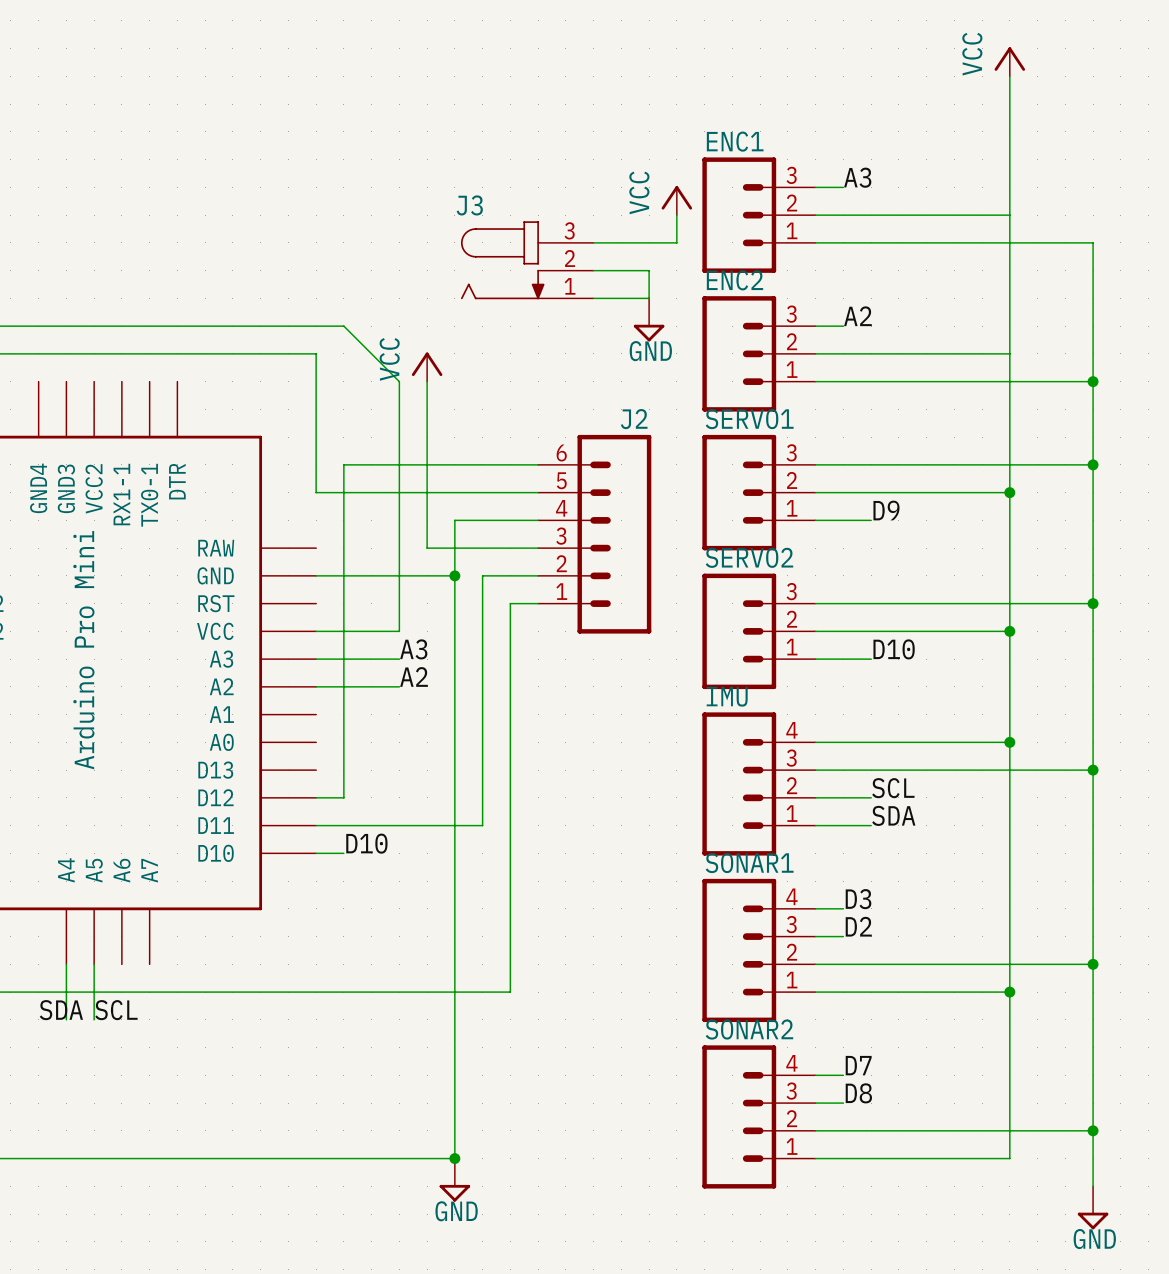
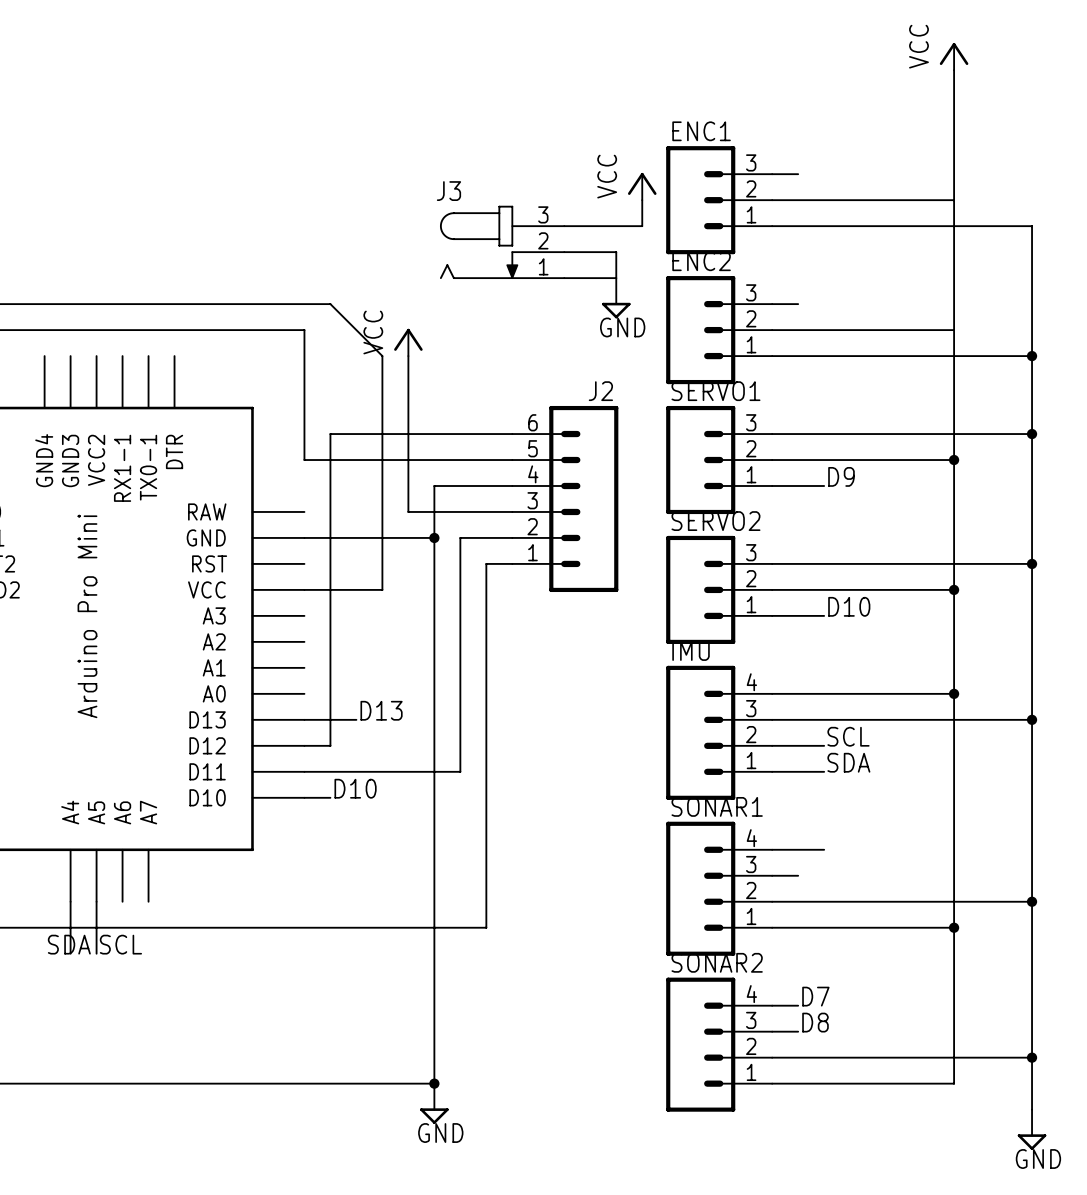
label: A3 (857, 177) -> none
label: A2 (857, 316) -> none
label: A3 (413, 649) -> none
wire: (316, 659) (399, 659) -> none
label: A2 (413, 676) -> none
wire: (316, 686) (399, 686) -> none
label: none -> D13 (381, 710)
wire: none -> (304, 719) (356, 719)
label: D3 (858, 899) -> none
label: D2 (858, 926) -> none

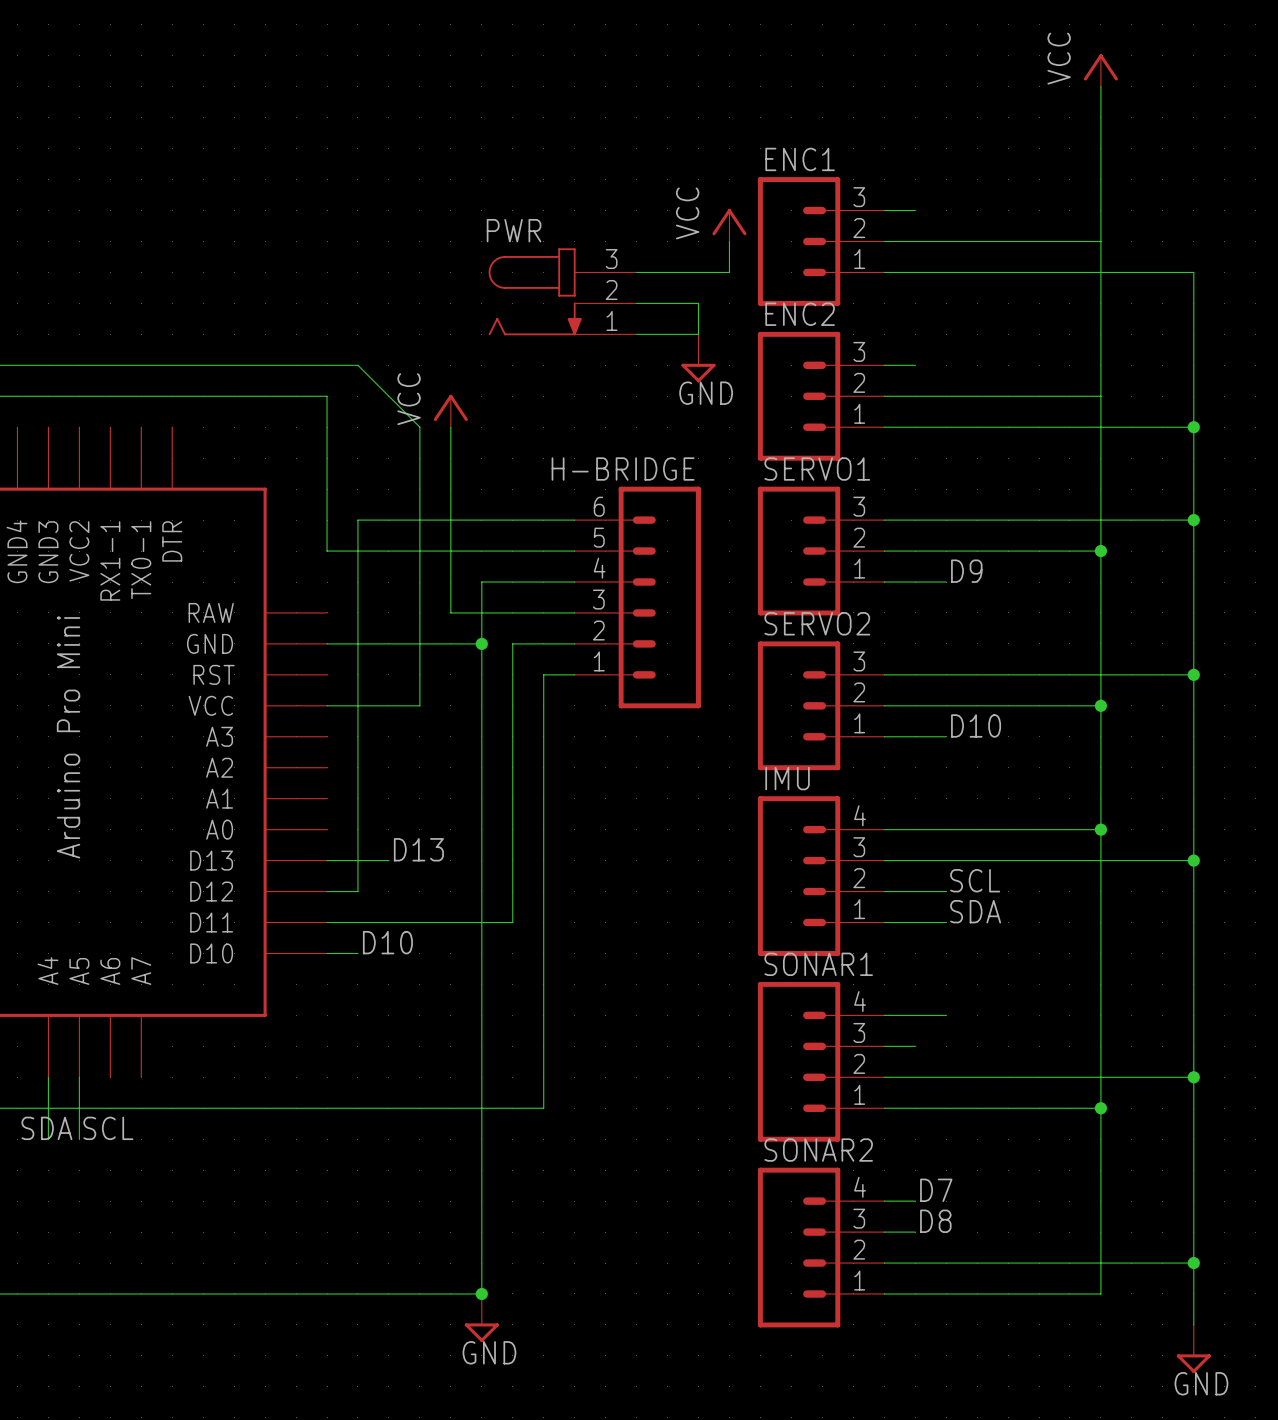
J3 name: J3 (448, 191) -> PWR (514, 230)
J2 name: J2 (600, 391) -> H-BRIDGE (623, 469)

